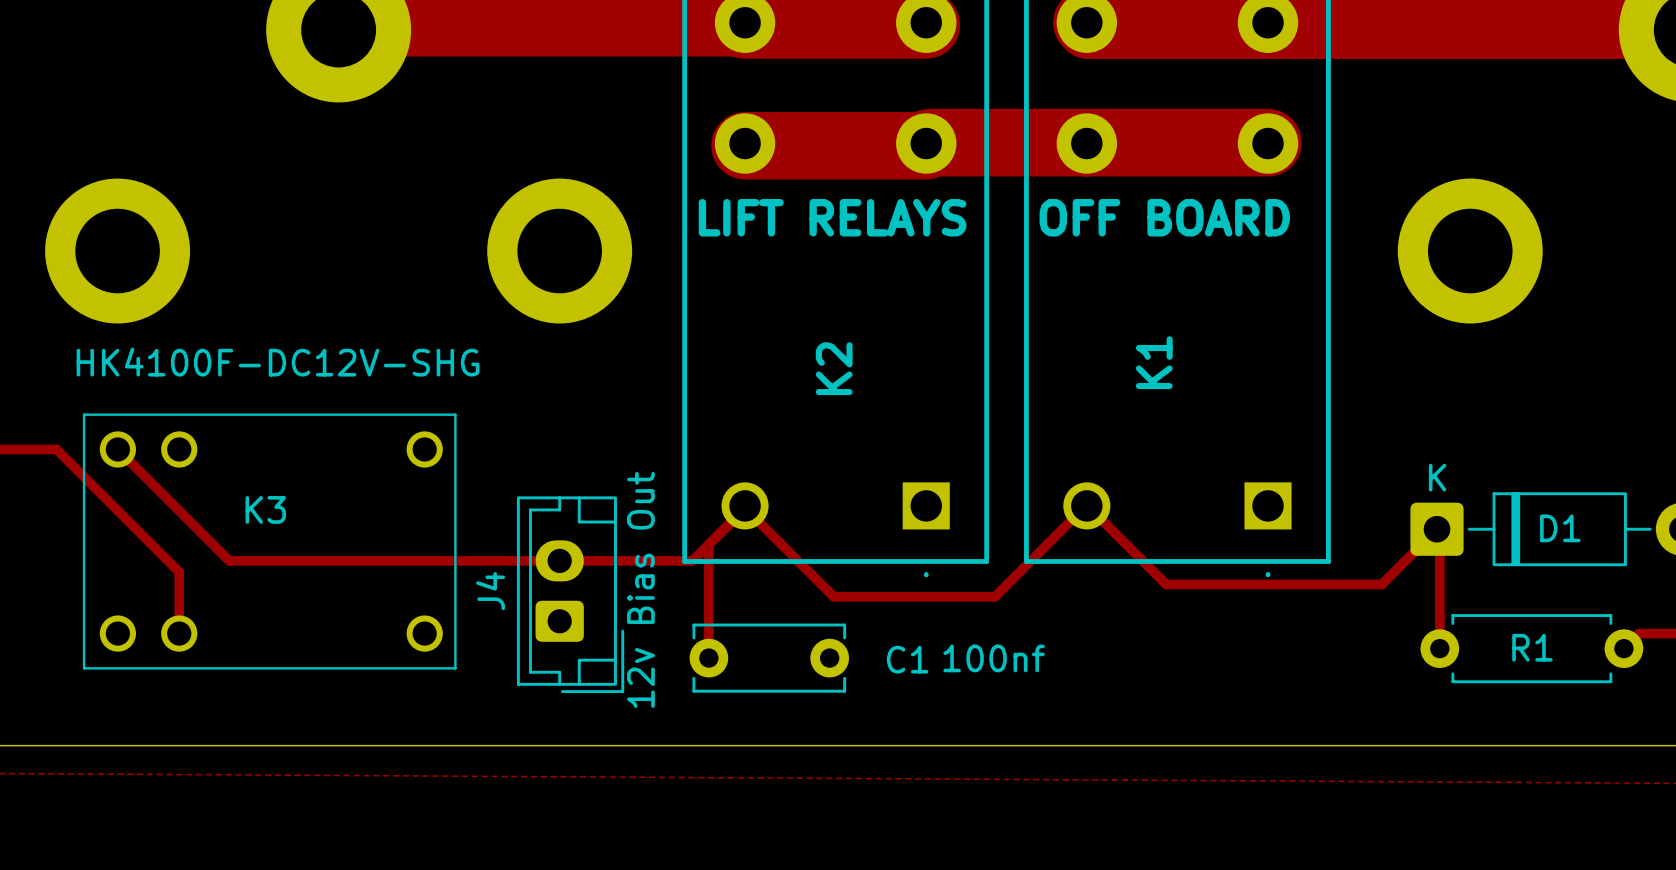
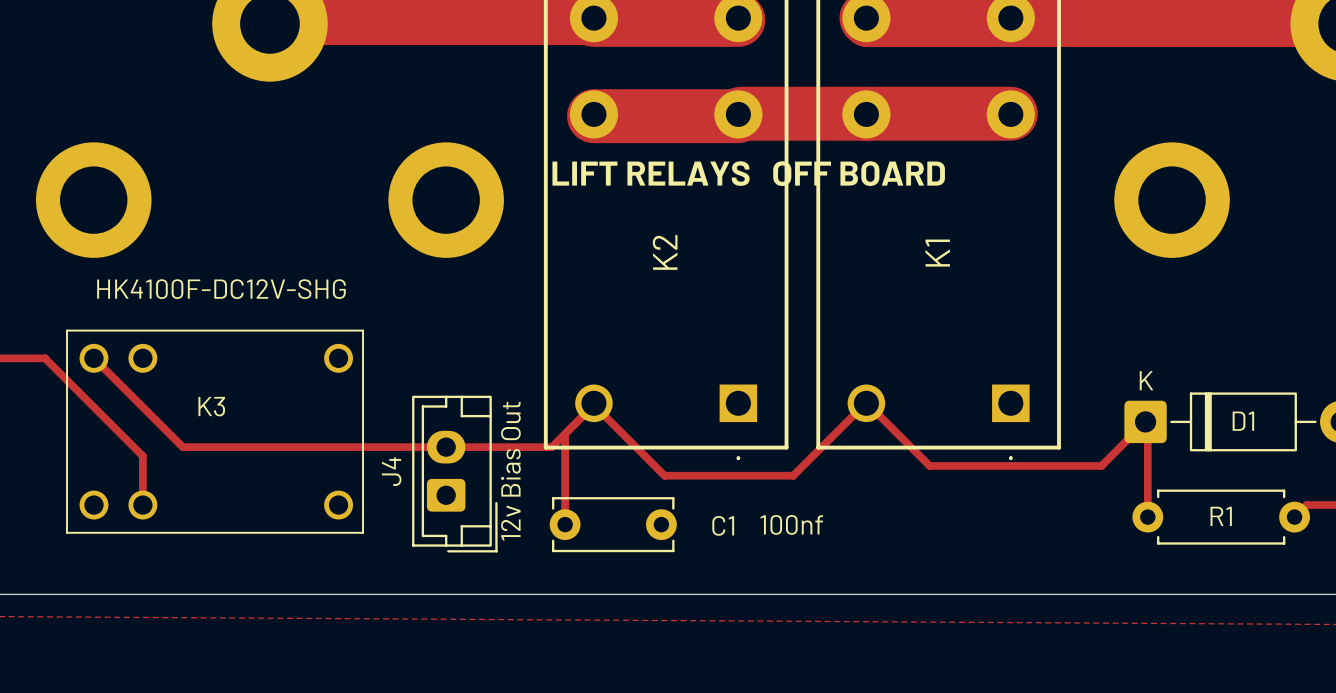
K1 name position: K1 (1154, 362) -> K1 (937, 253)
K2 name position: K2 (834, 368) -> K2 (665, 252)

